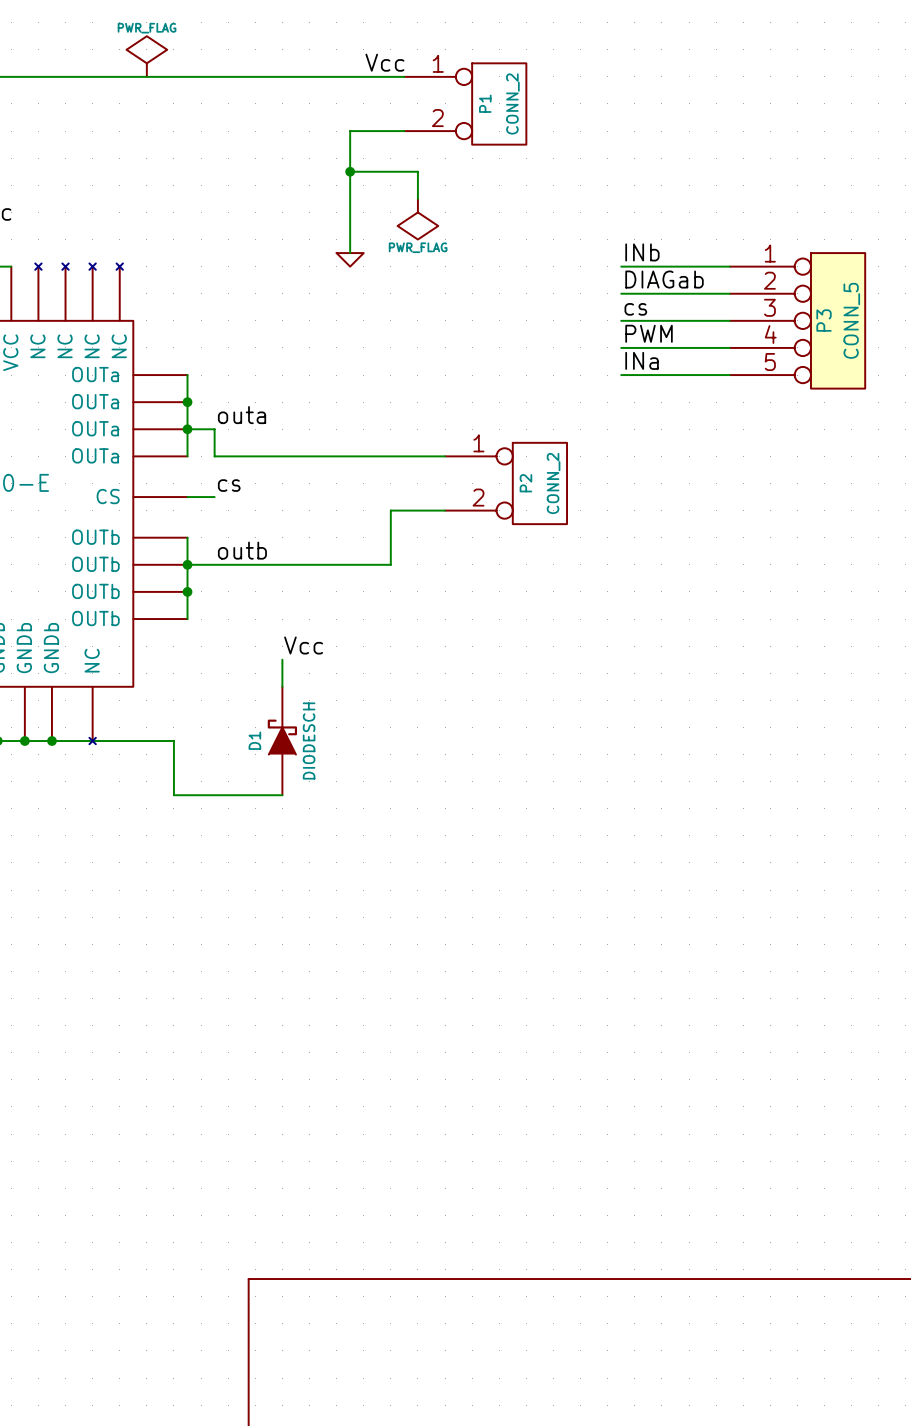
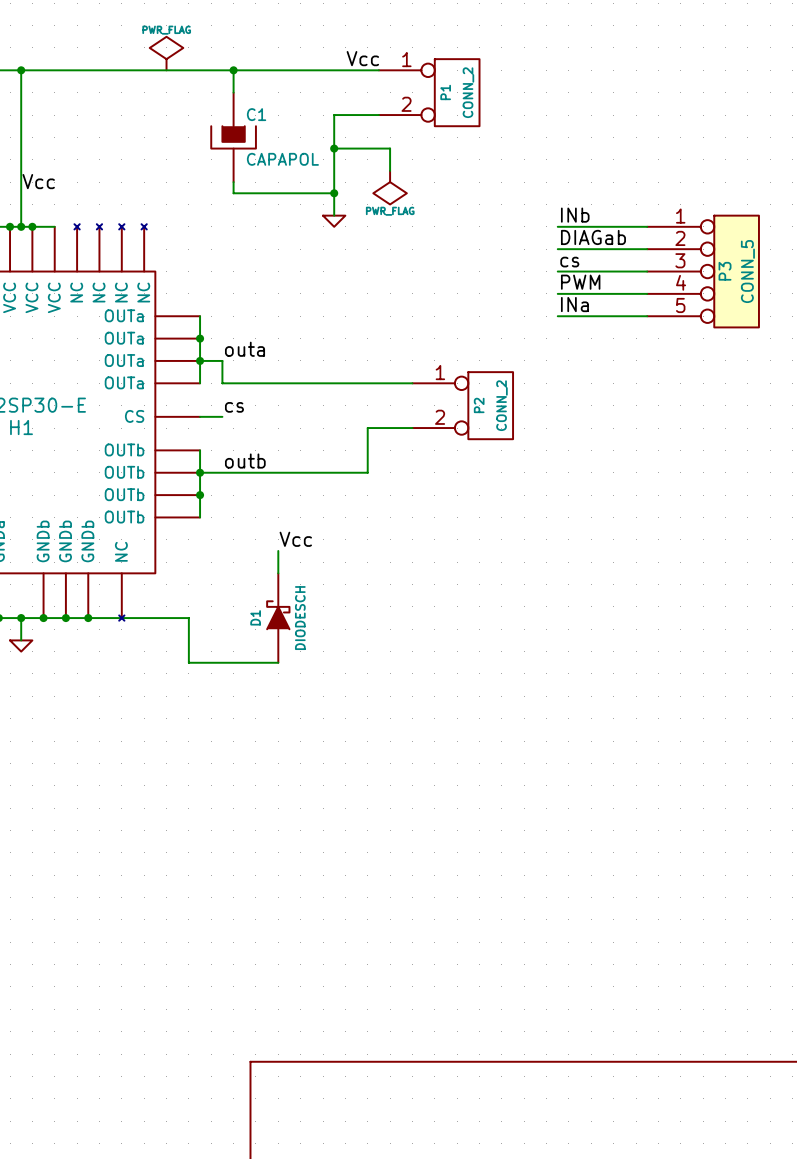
wire: none -> (233, 70) (233, 92)
junction: none -> (233, 70)
C1: none -> CAPAPOL (233, 137)
wire: none -> (233, 182) (233, 193) (334, 193)
junction: none -> (334, 193)

